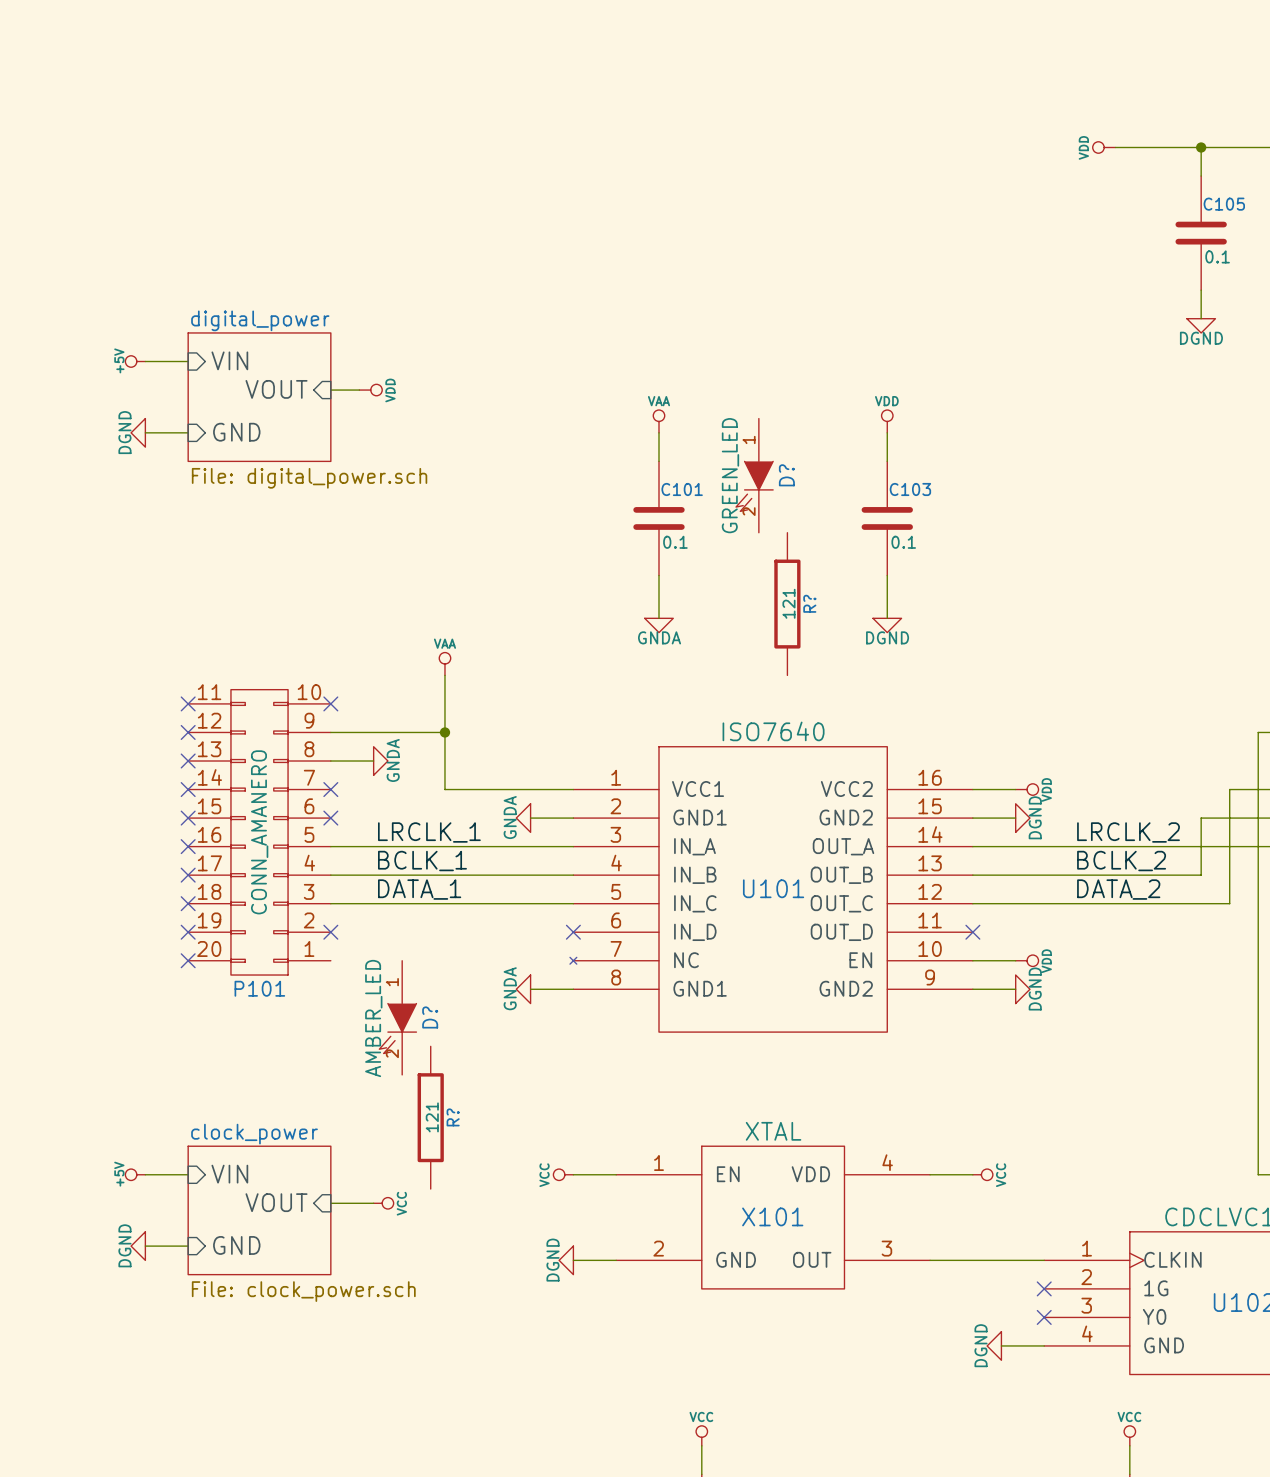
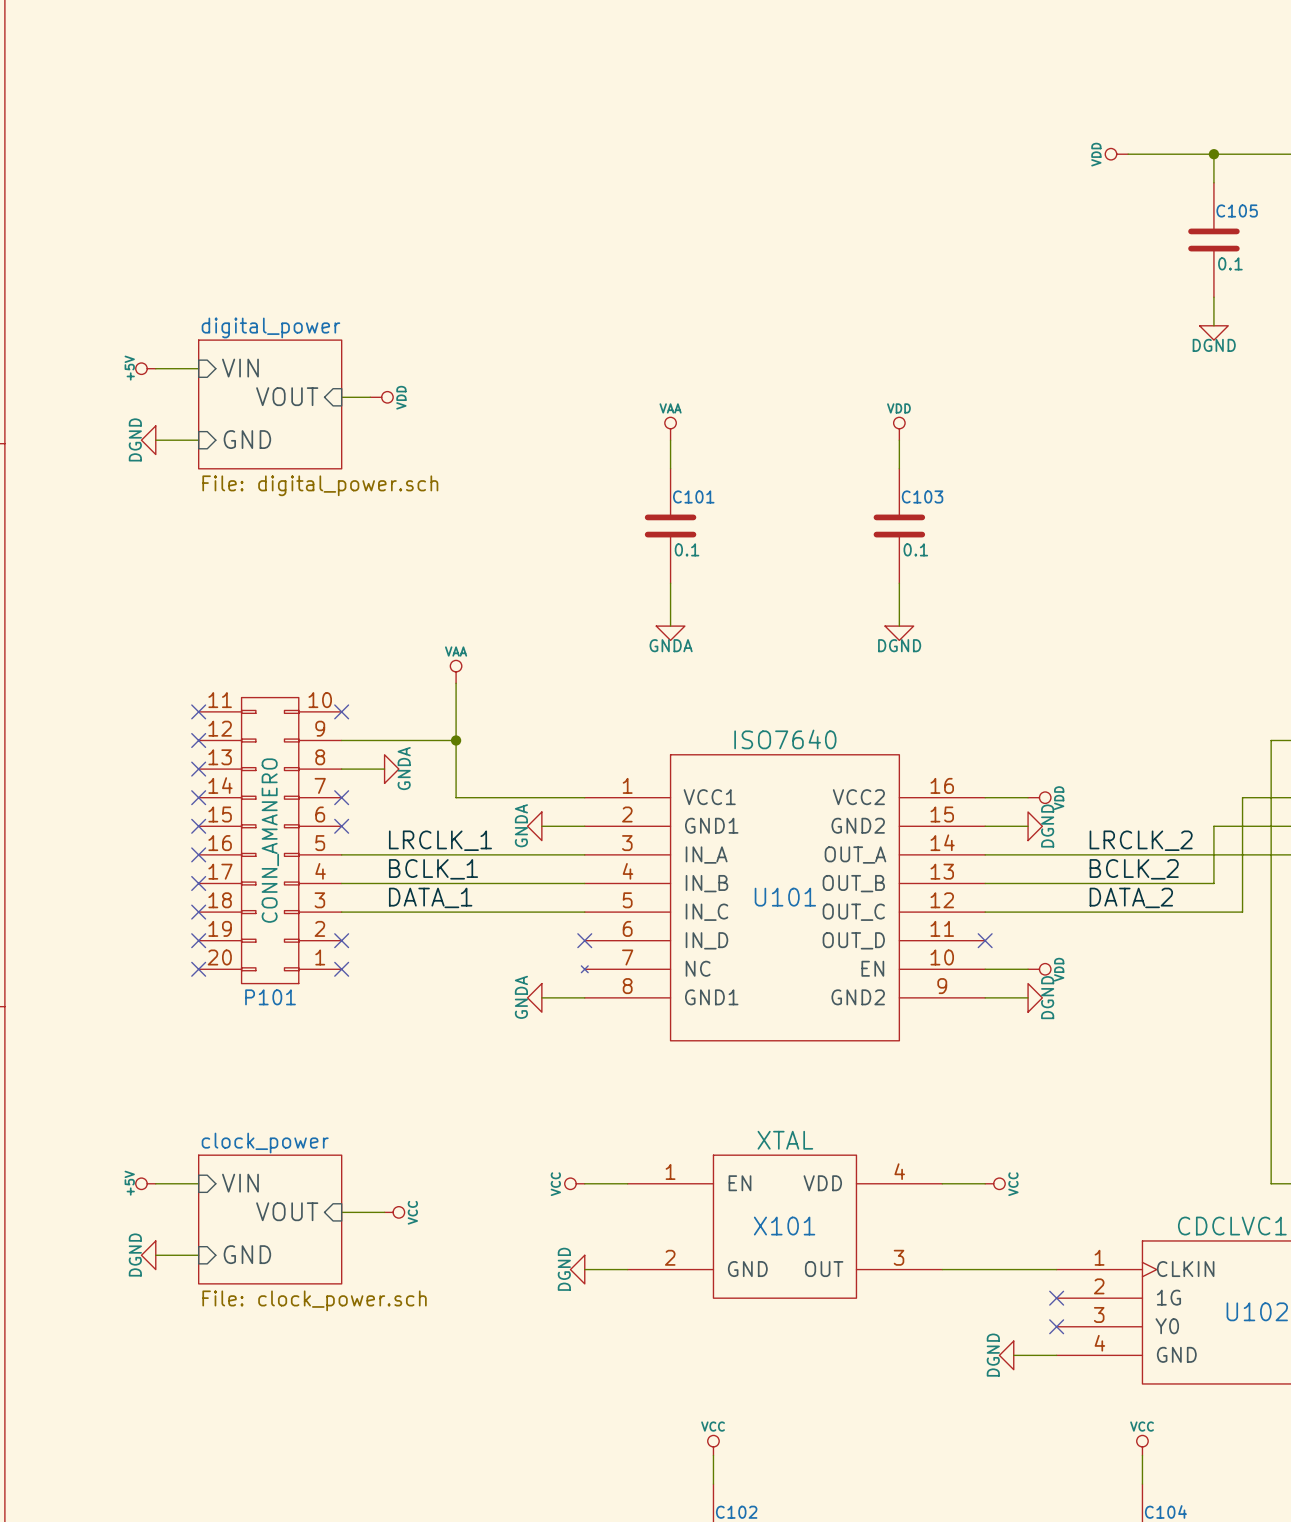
D?: GREEN_LED (754, 475) -> none
R?: 121 (787, 604) -> none
no-connect mark: none -> (341, 969)
D?: AMBER_LED (397, 1017) -> none
R?: 121 (430, 1117) -> none

